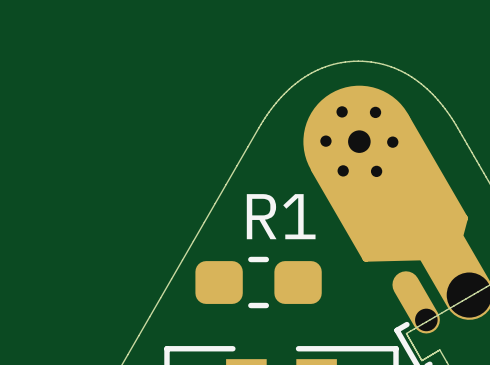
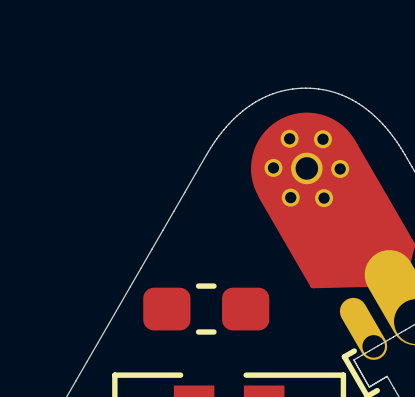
R1 name: R1 (281, 216) -> none

